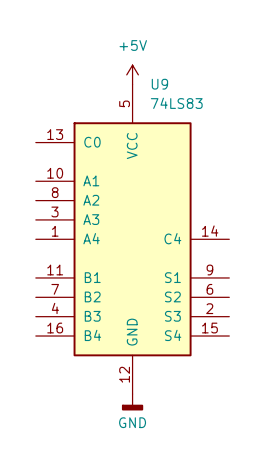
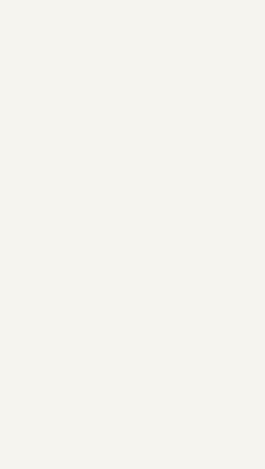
power symbol: +5V (132, 74) -> none
U9: 74LS83 (132, 239) -> none
power symbol: GND (132, 402) -> none

